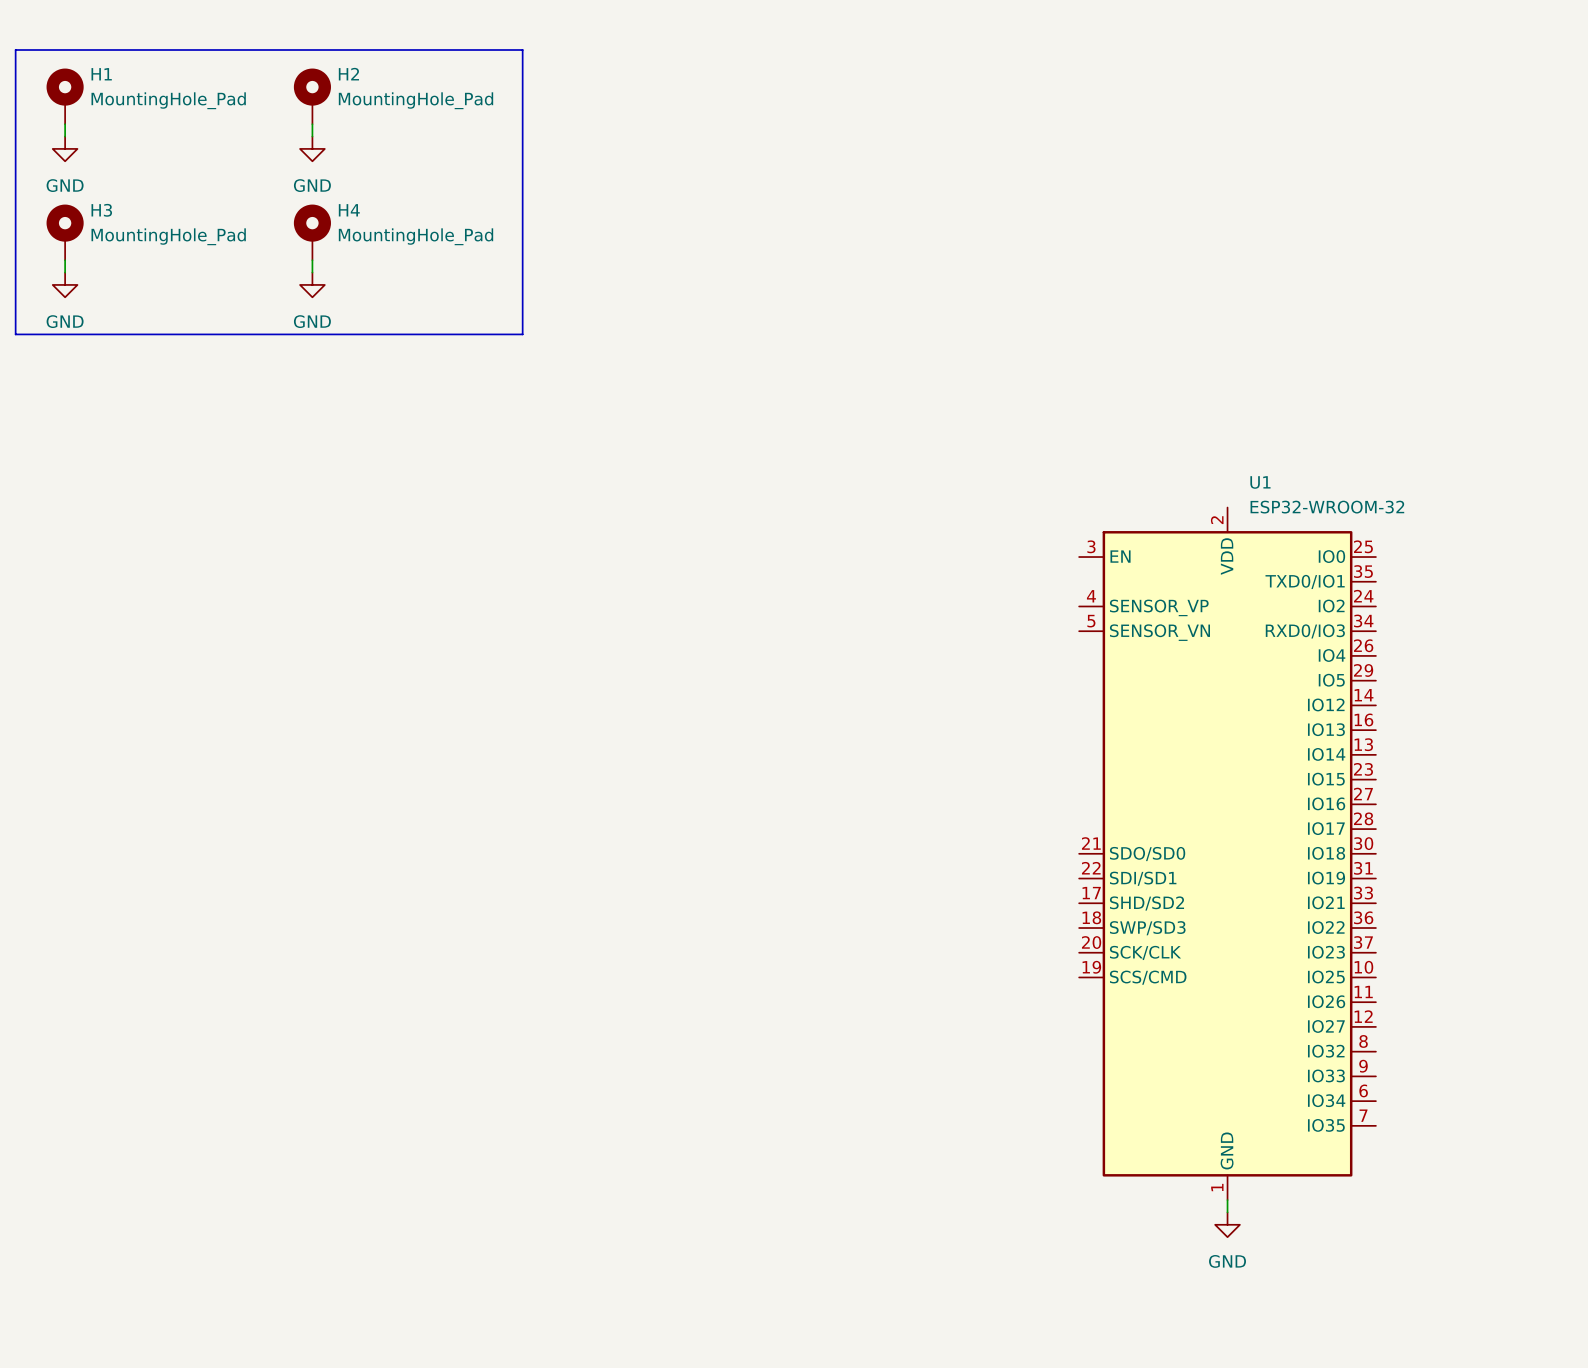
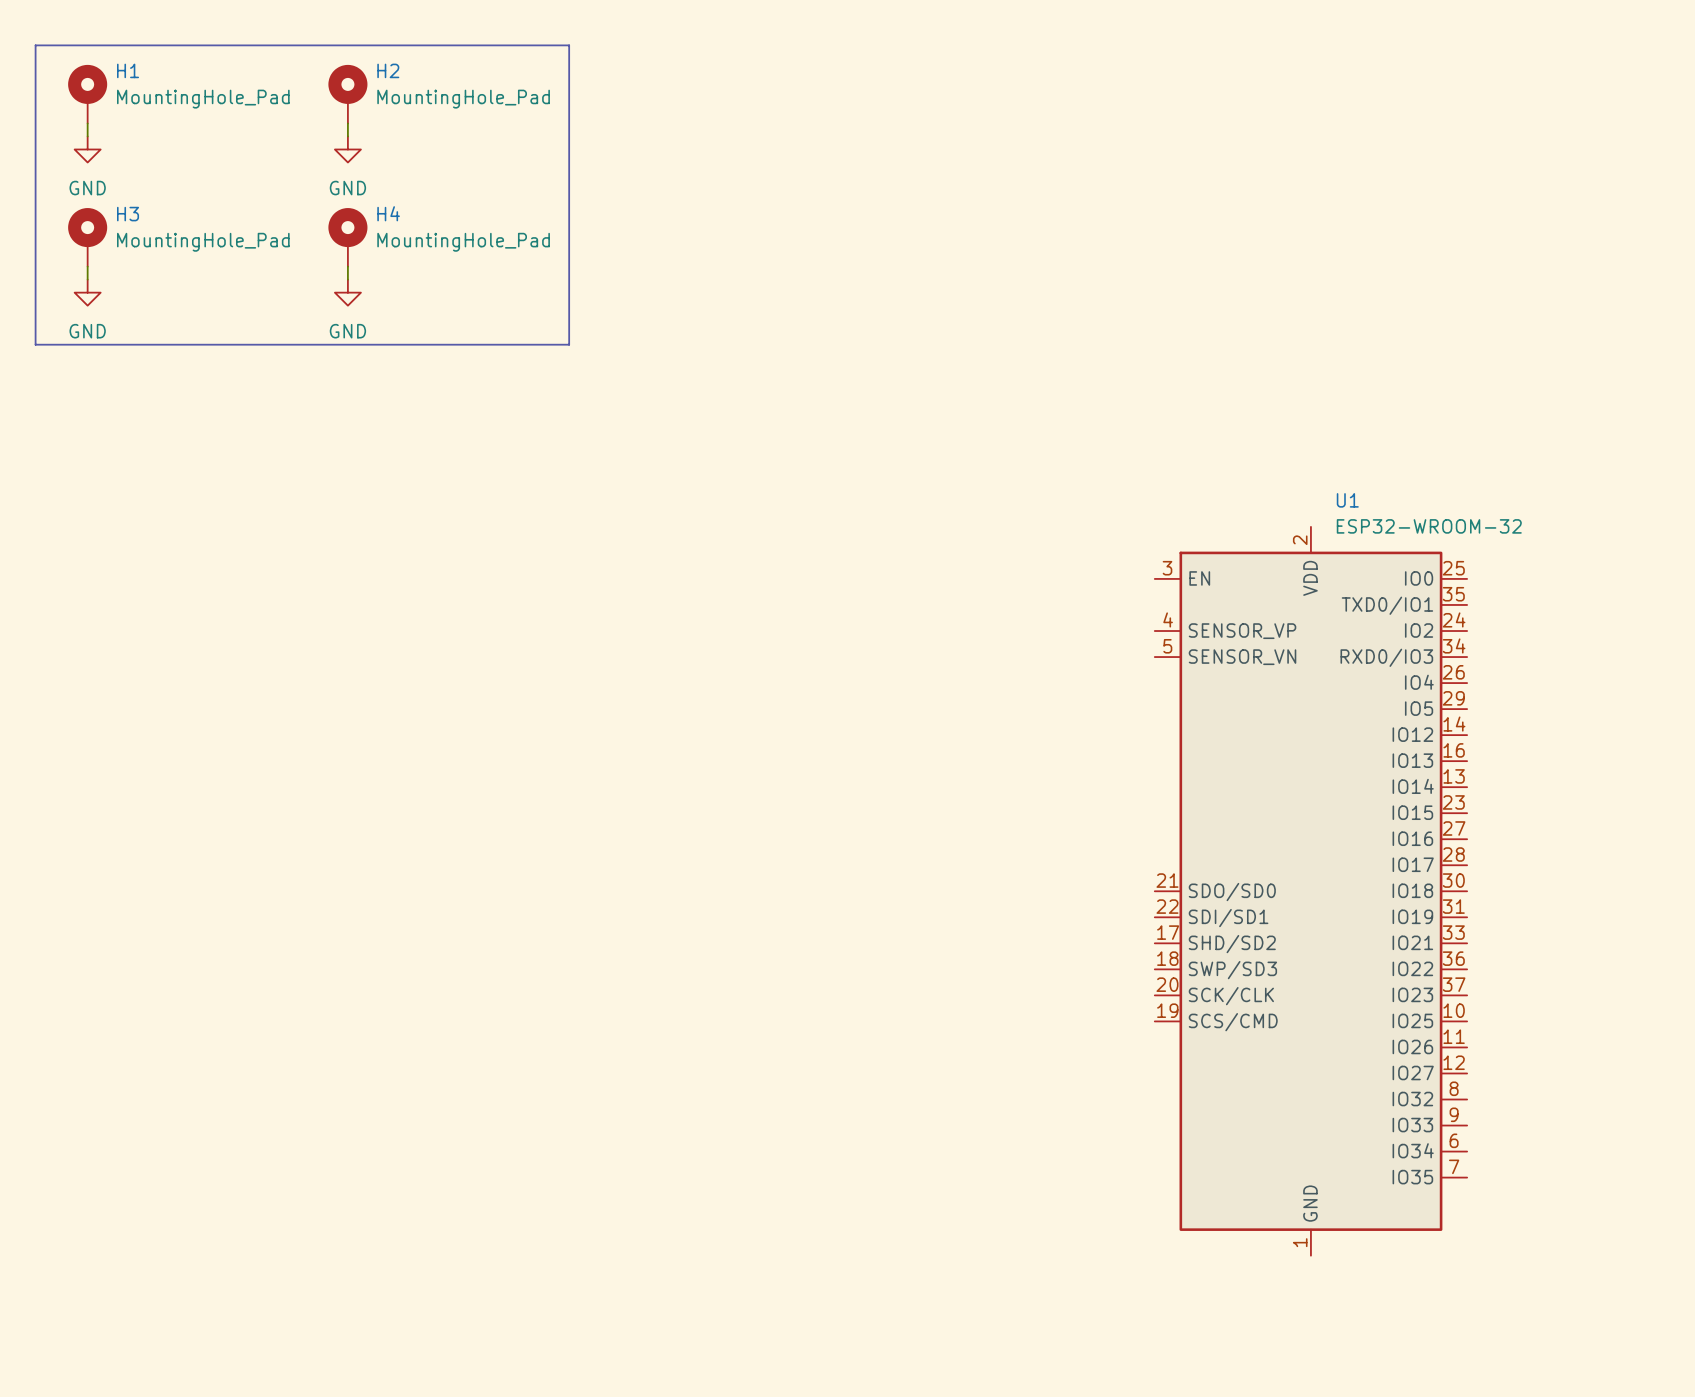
wire: (1227, 1200) (1227, 1212) -> none
power symbol: GND (1227, 1224) -> none

